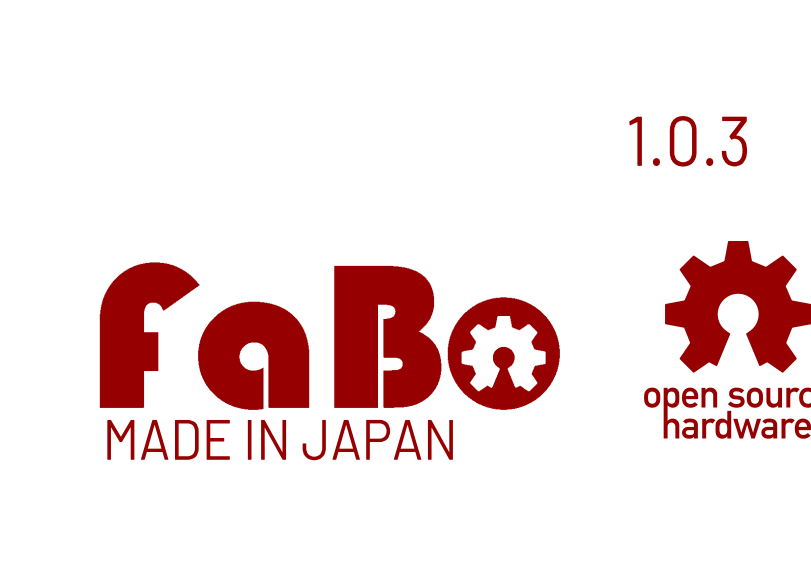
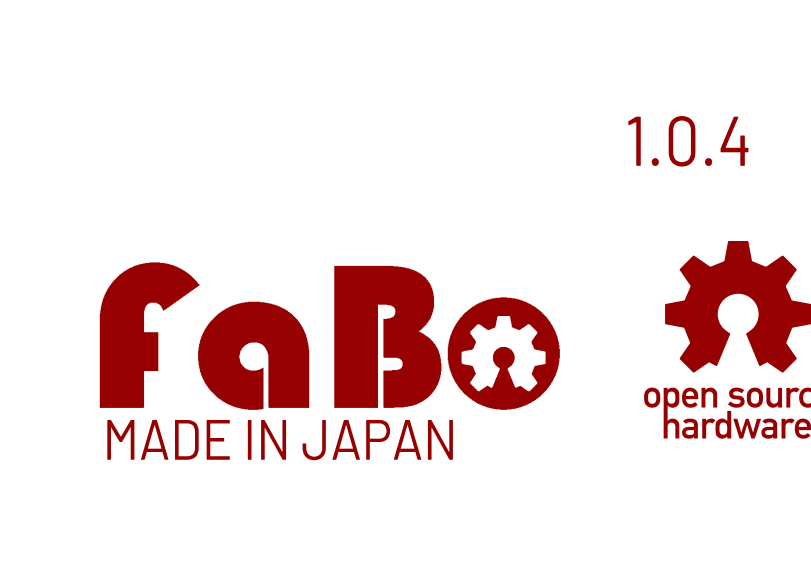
text: 1.0.3 (688, 141) -> 1.0.4 (688, 141)

